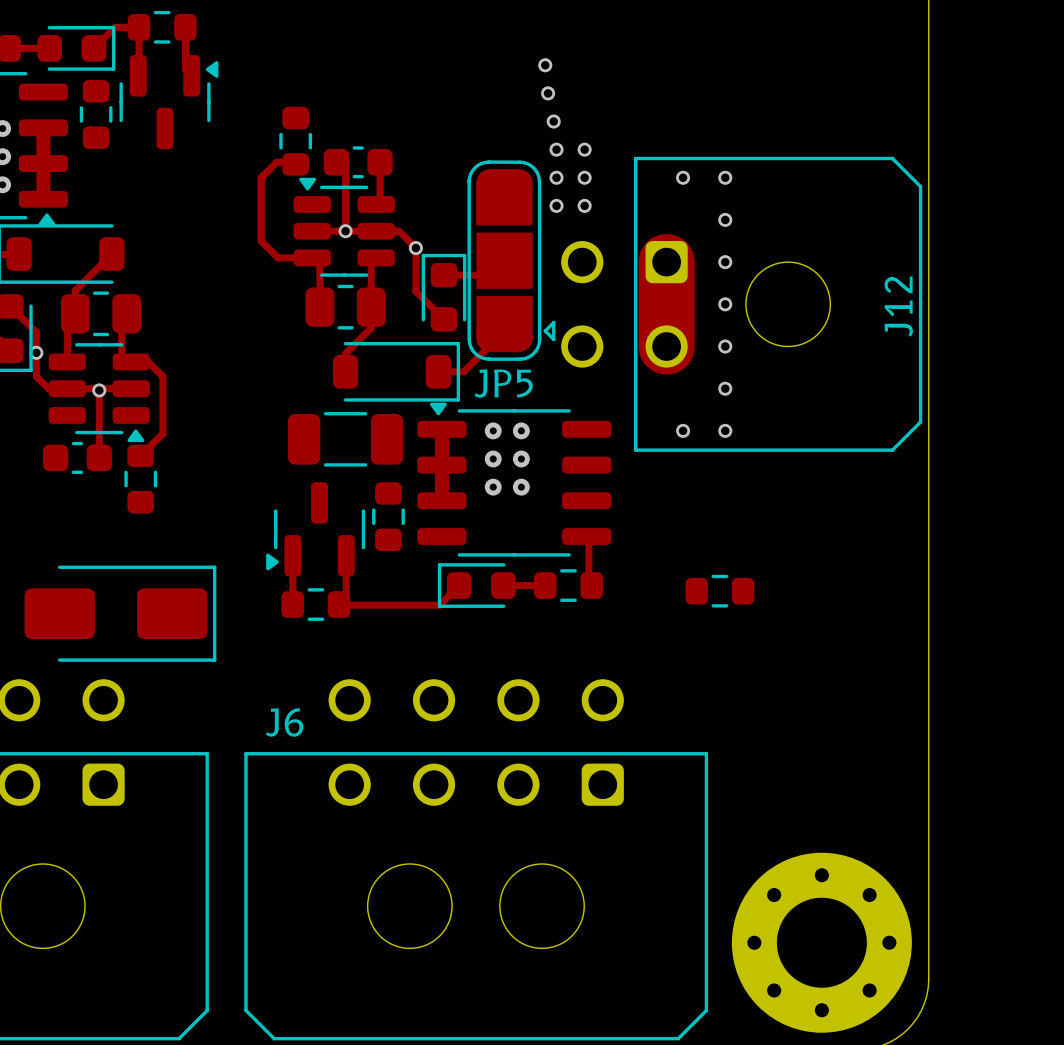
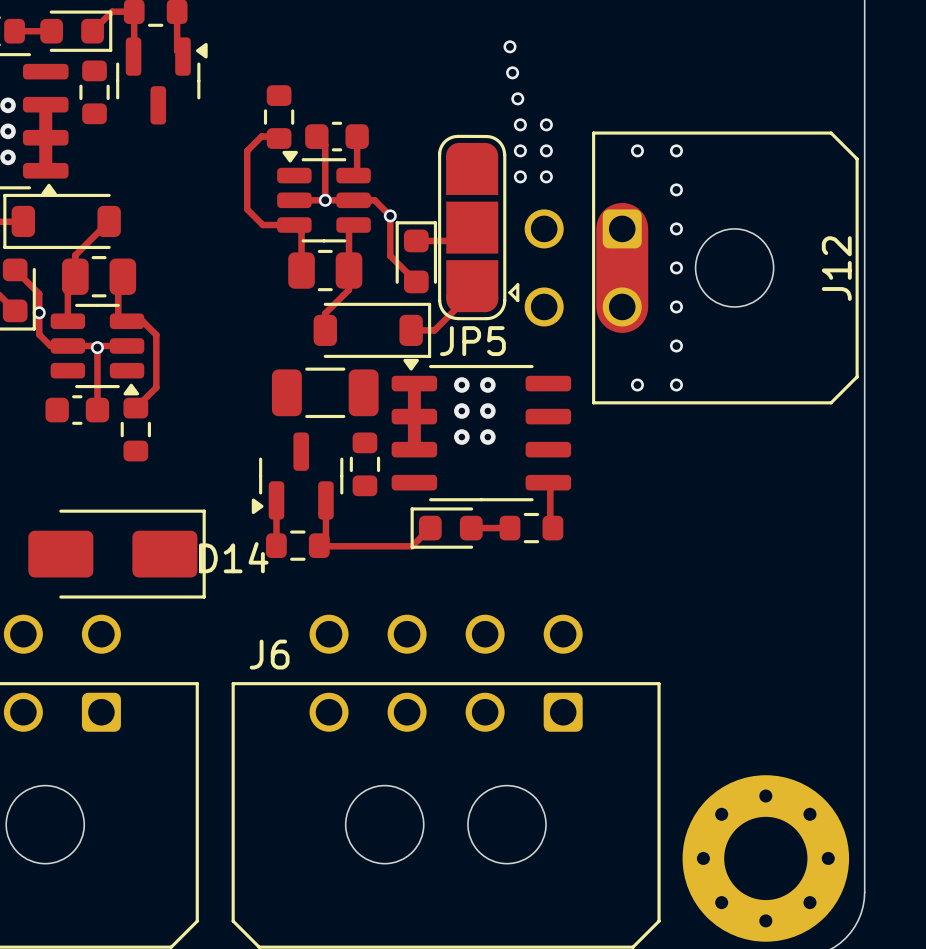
part: (719, 591) -> none
D14 name: none -> D14 (233, 557)

